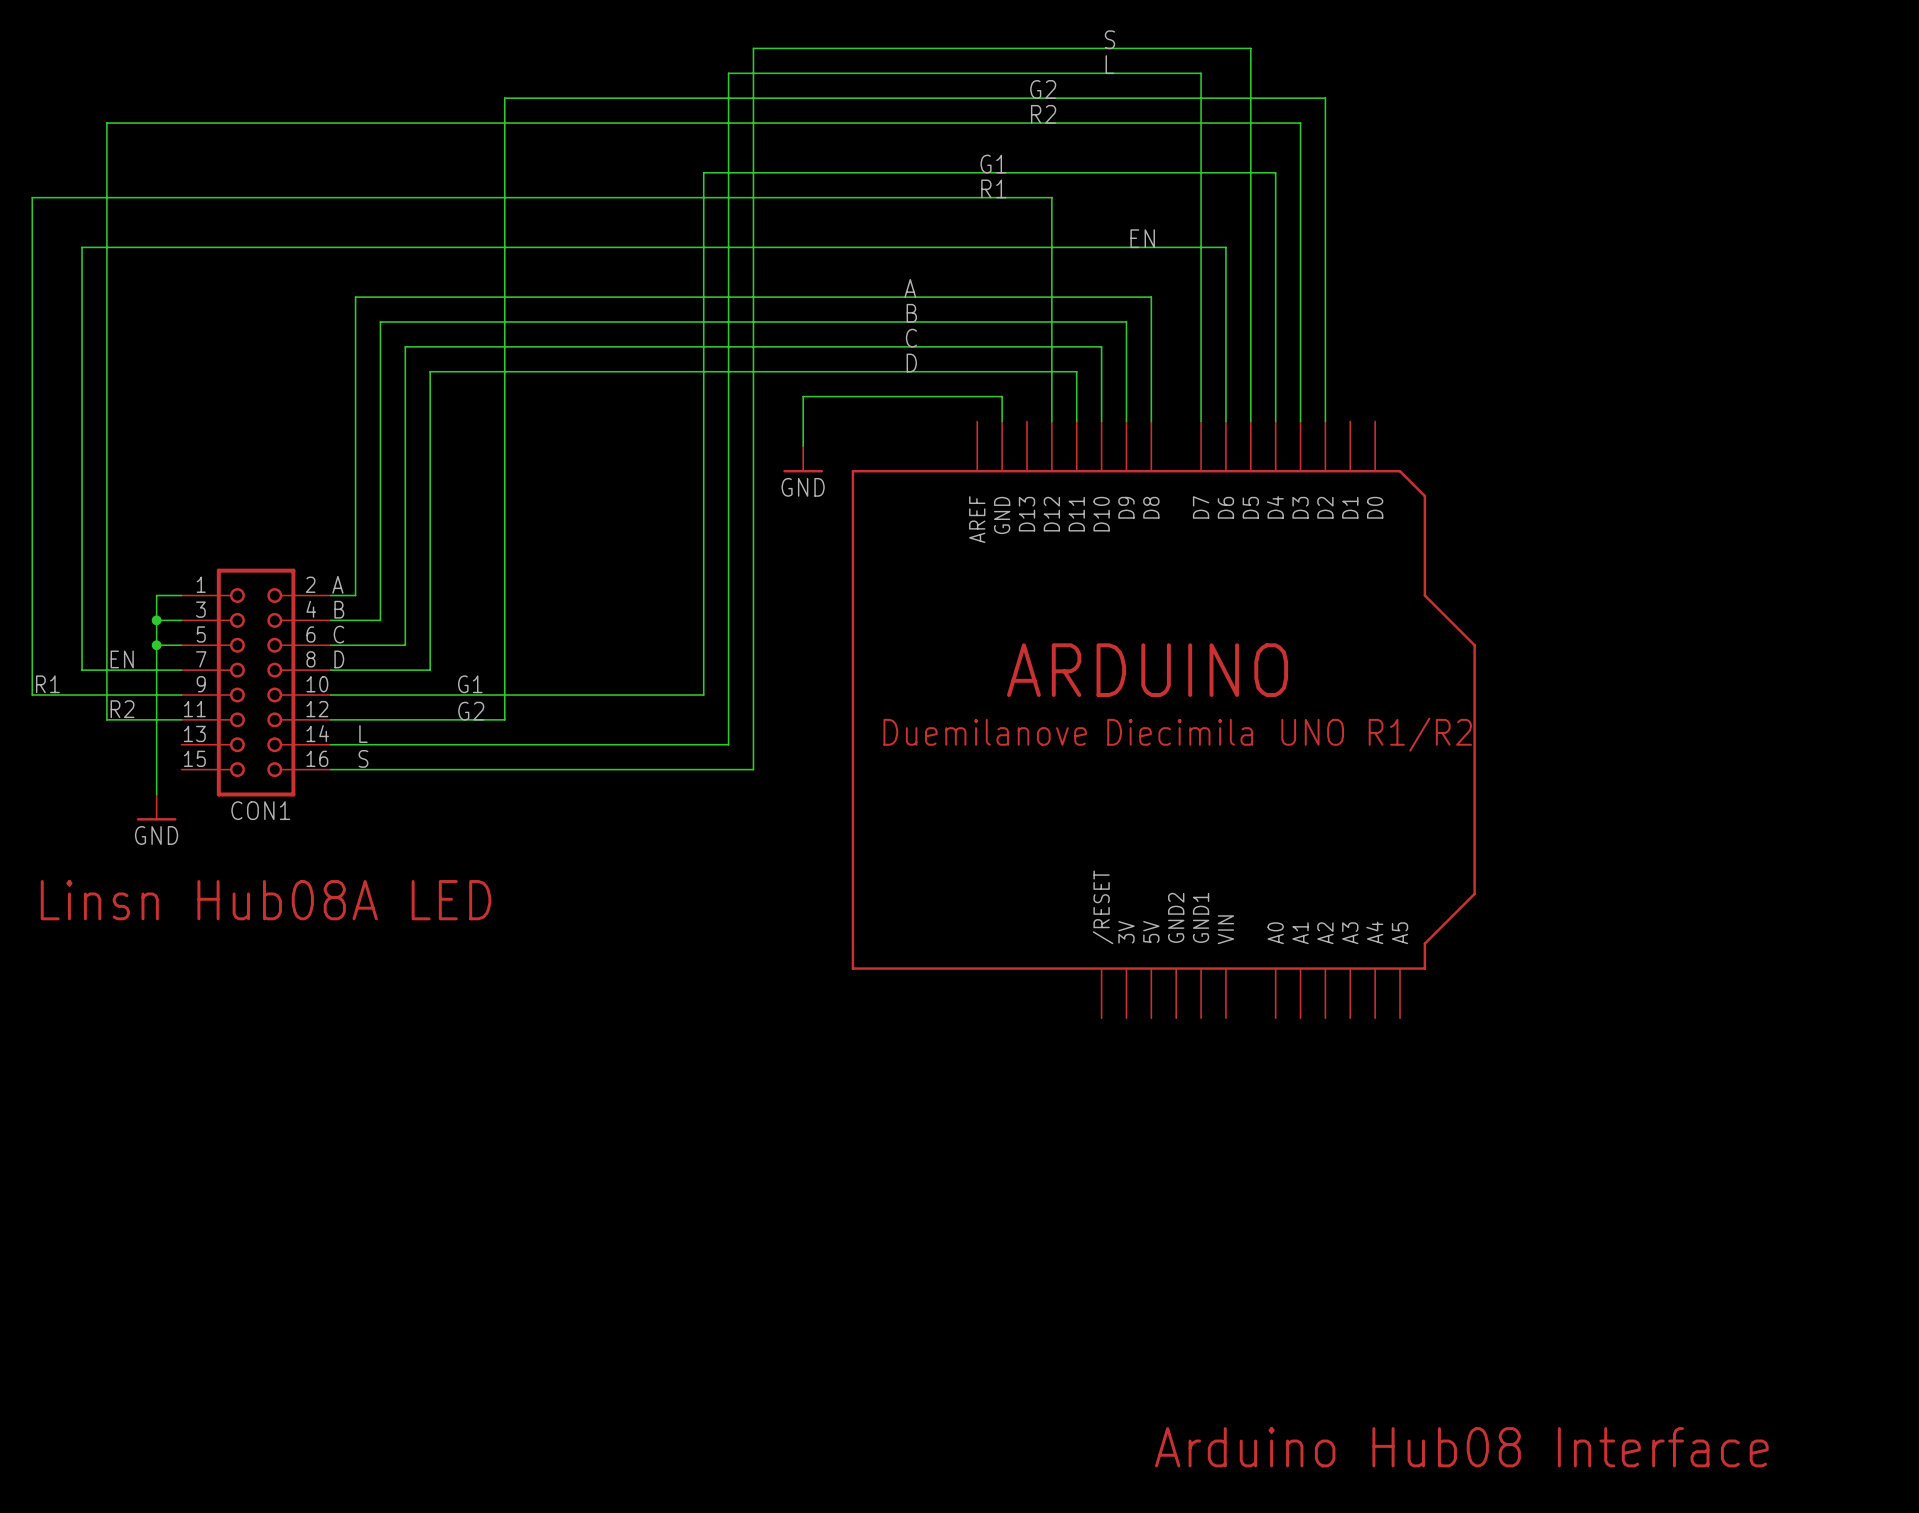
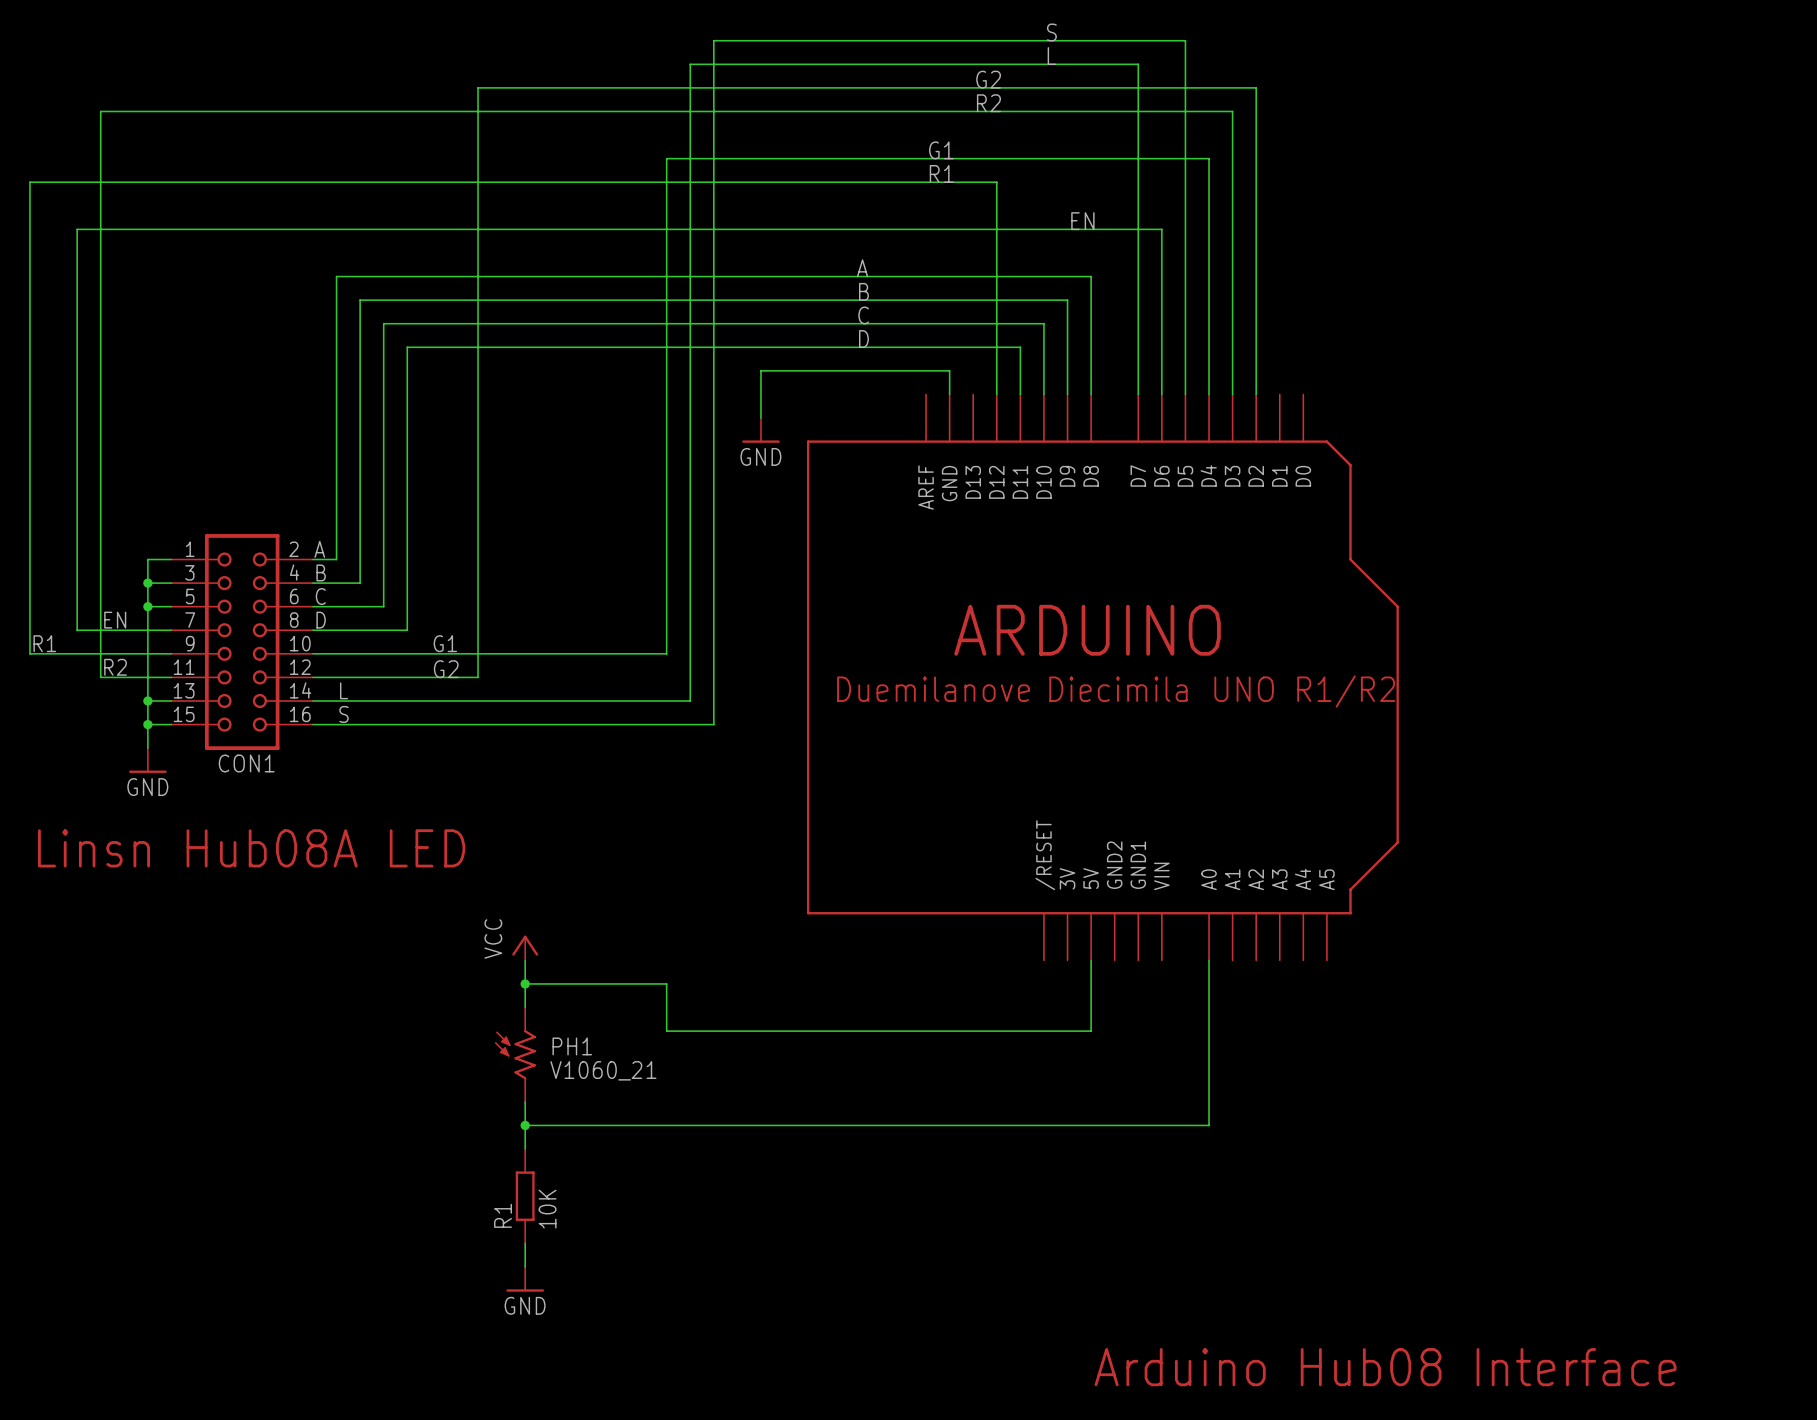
wire: none -> (147, 701) (171, 701)
junction: none -> (147, 701)
wire: none -> (147, 724) (171, 724)
junction: none -> (147, 724)
power symbol: none -> VCC (525, 948)
wire: none -> (525, 960) (525, 1007)
wire: none -> (1091, 960) (1091, 1031) (666, 1031) (666, 983) (525, 983)
wire: none -> (1209, 960) (1209, 1125) (525, 1125)
junction: none -> (525, 983)
PH1: none -> V1060_21 (515, 1054)
wire: none -> (525, 1101) (525, 1149)
junction: none -> (525, 1125)
R1: none -> 10K (525, 1196)
wire: none -> (525, 1243) (525, 1266)
power symbol: none -> GND (525, 1279)

